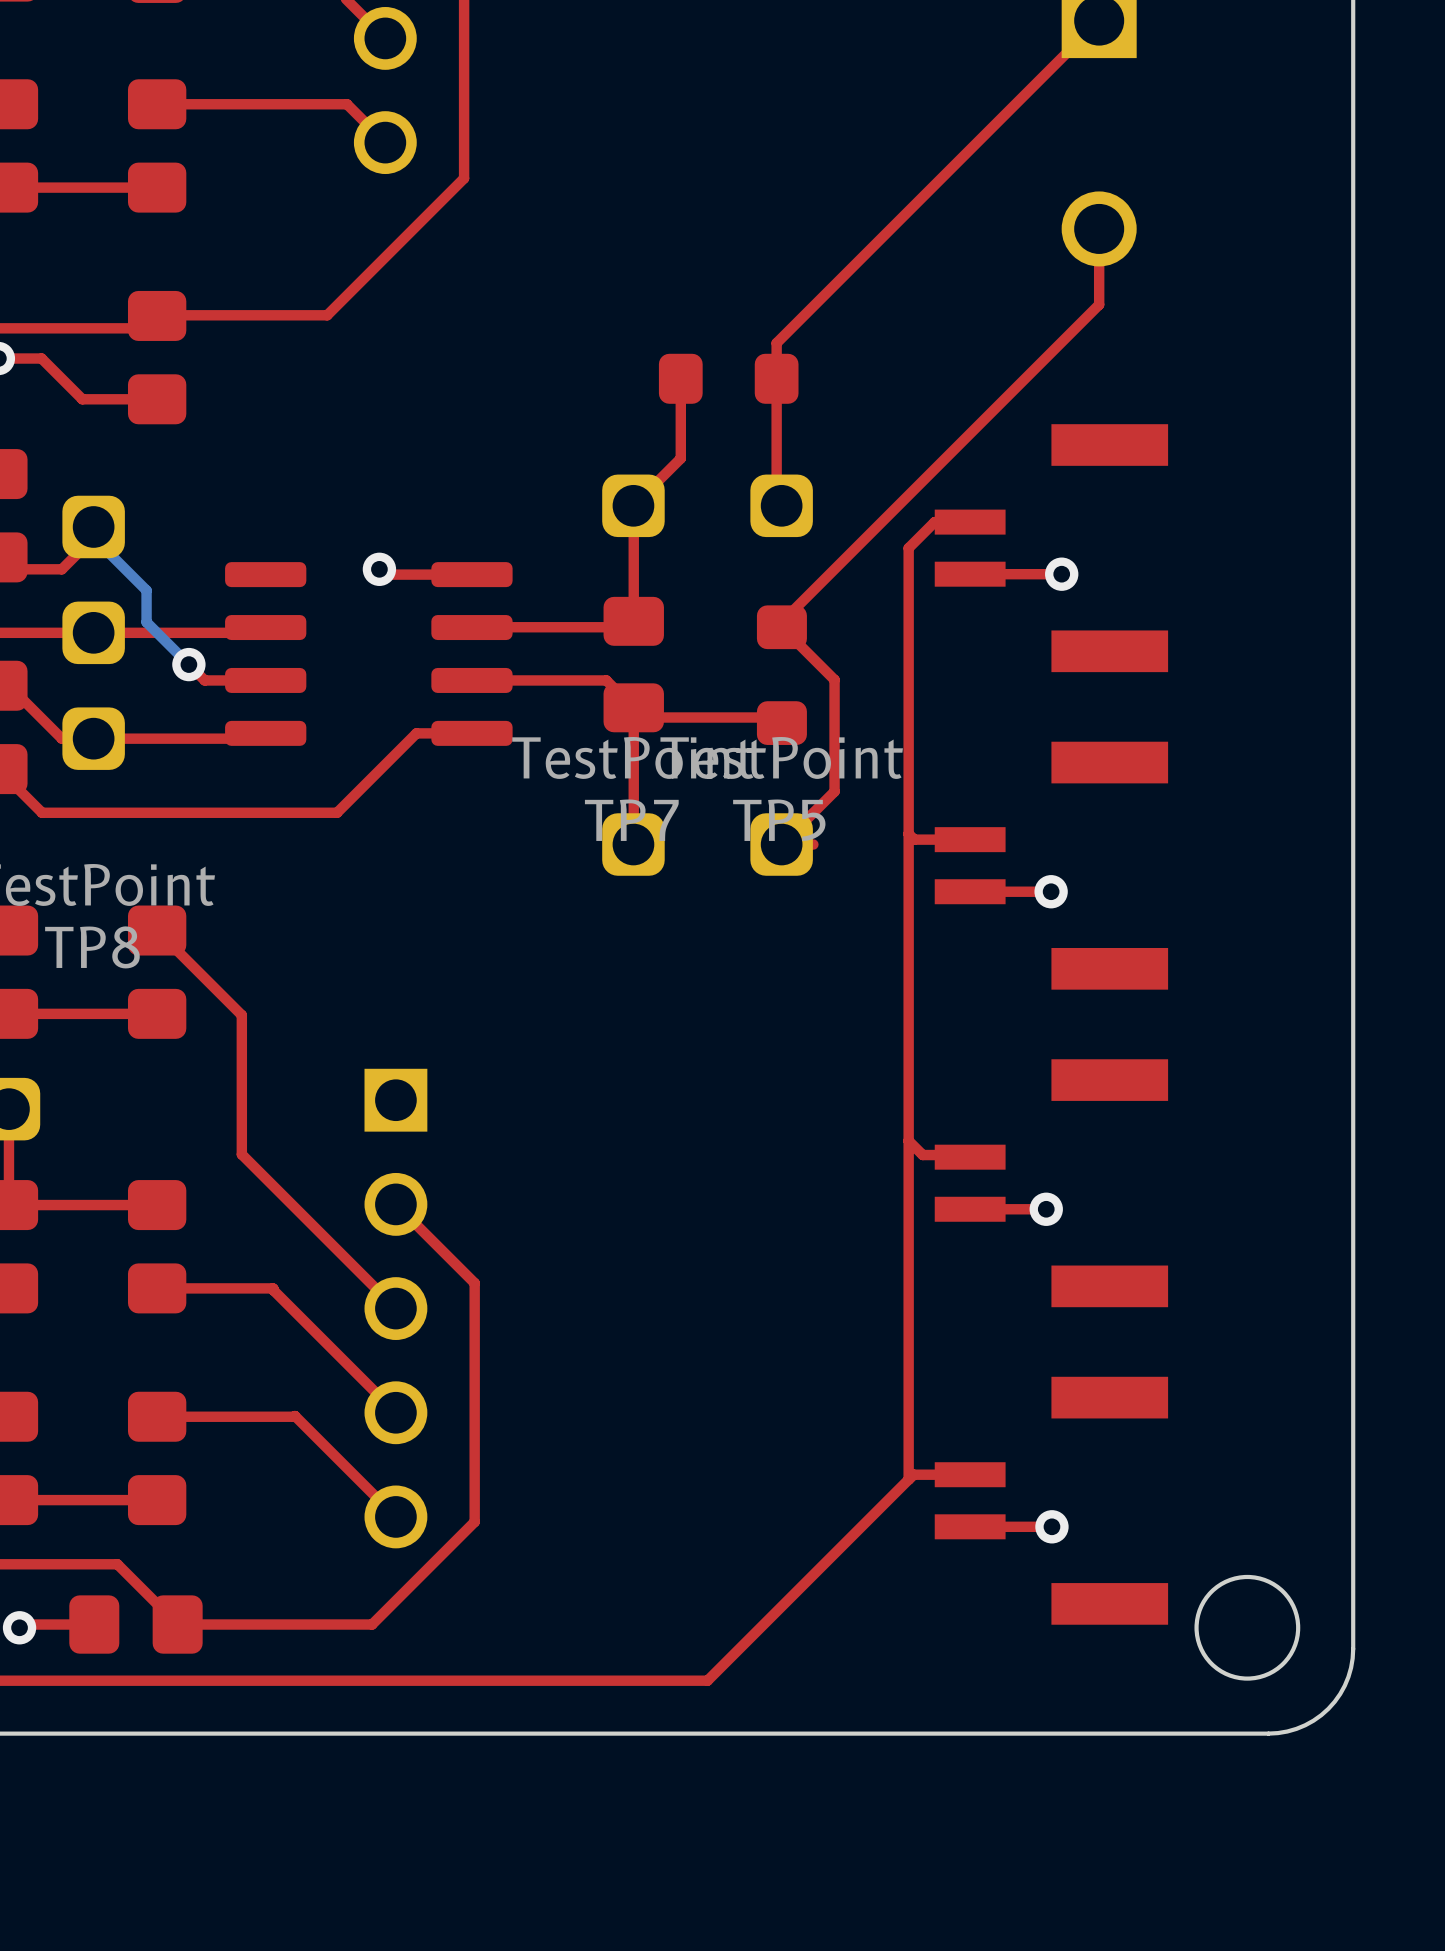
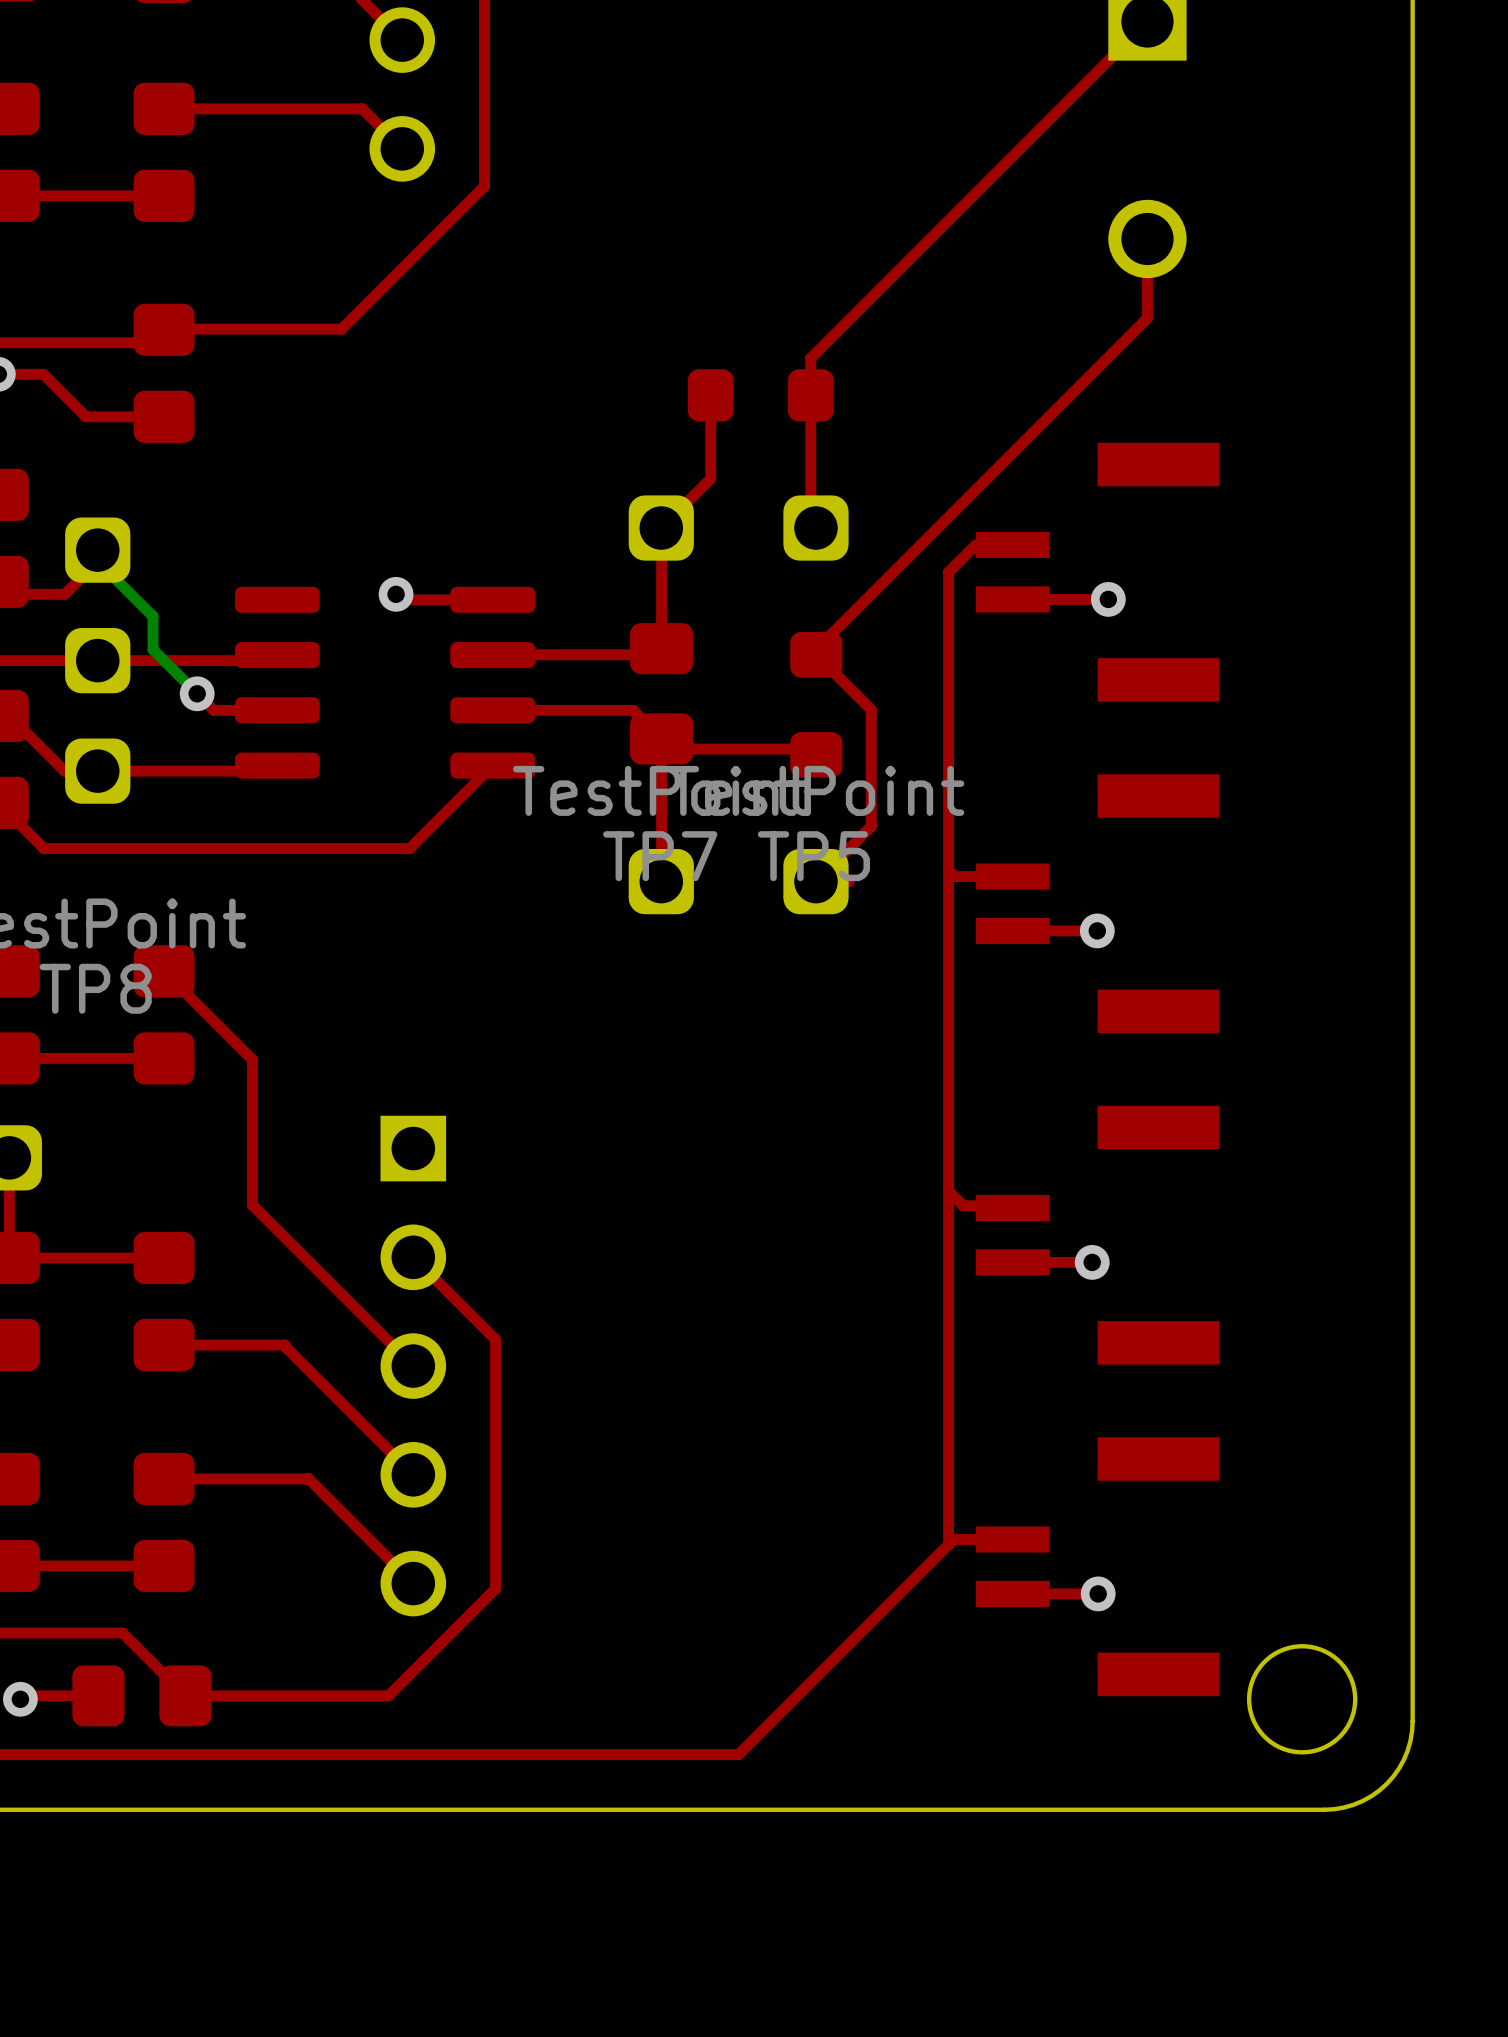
top track: (471, 733) (416, 733) (337, 812) -> (492, 765) (409, 848) (351, 848)

